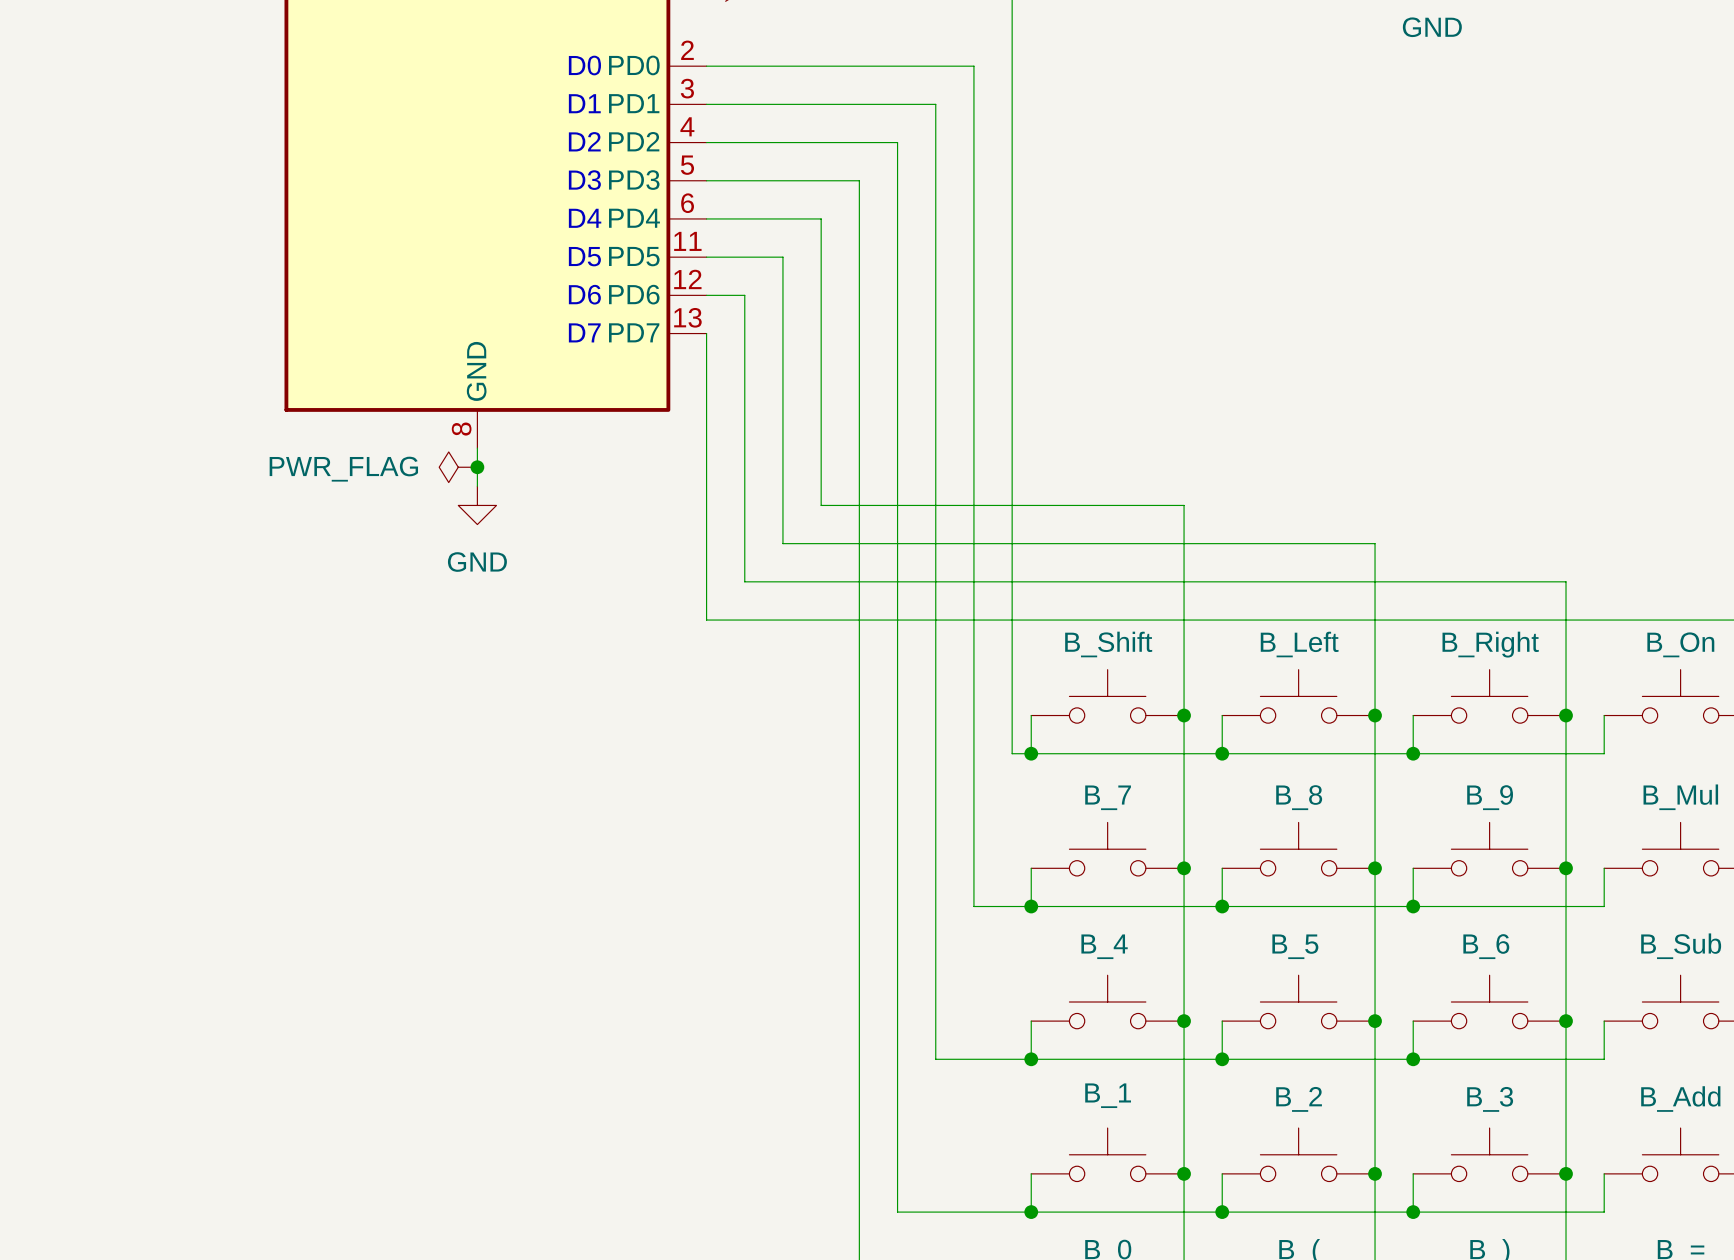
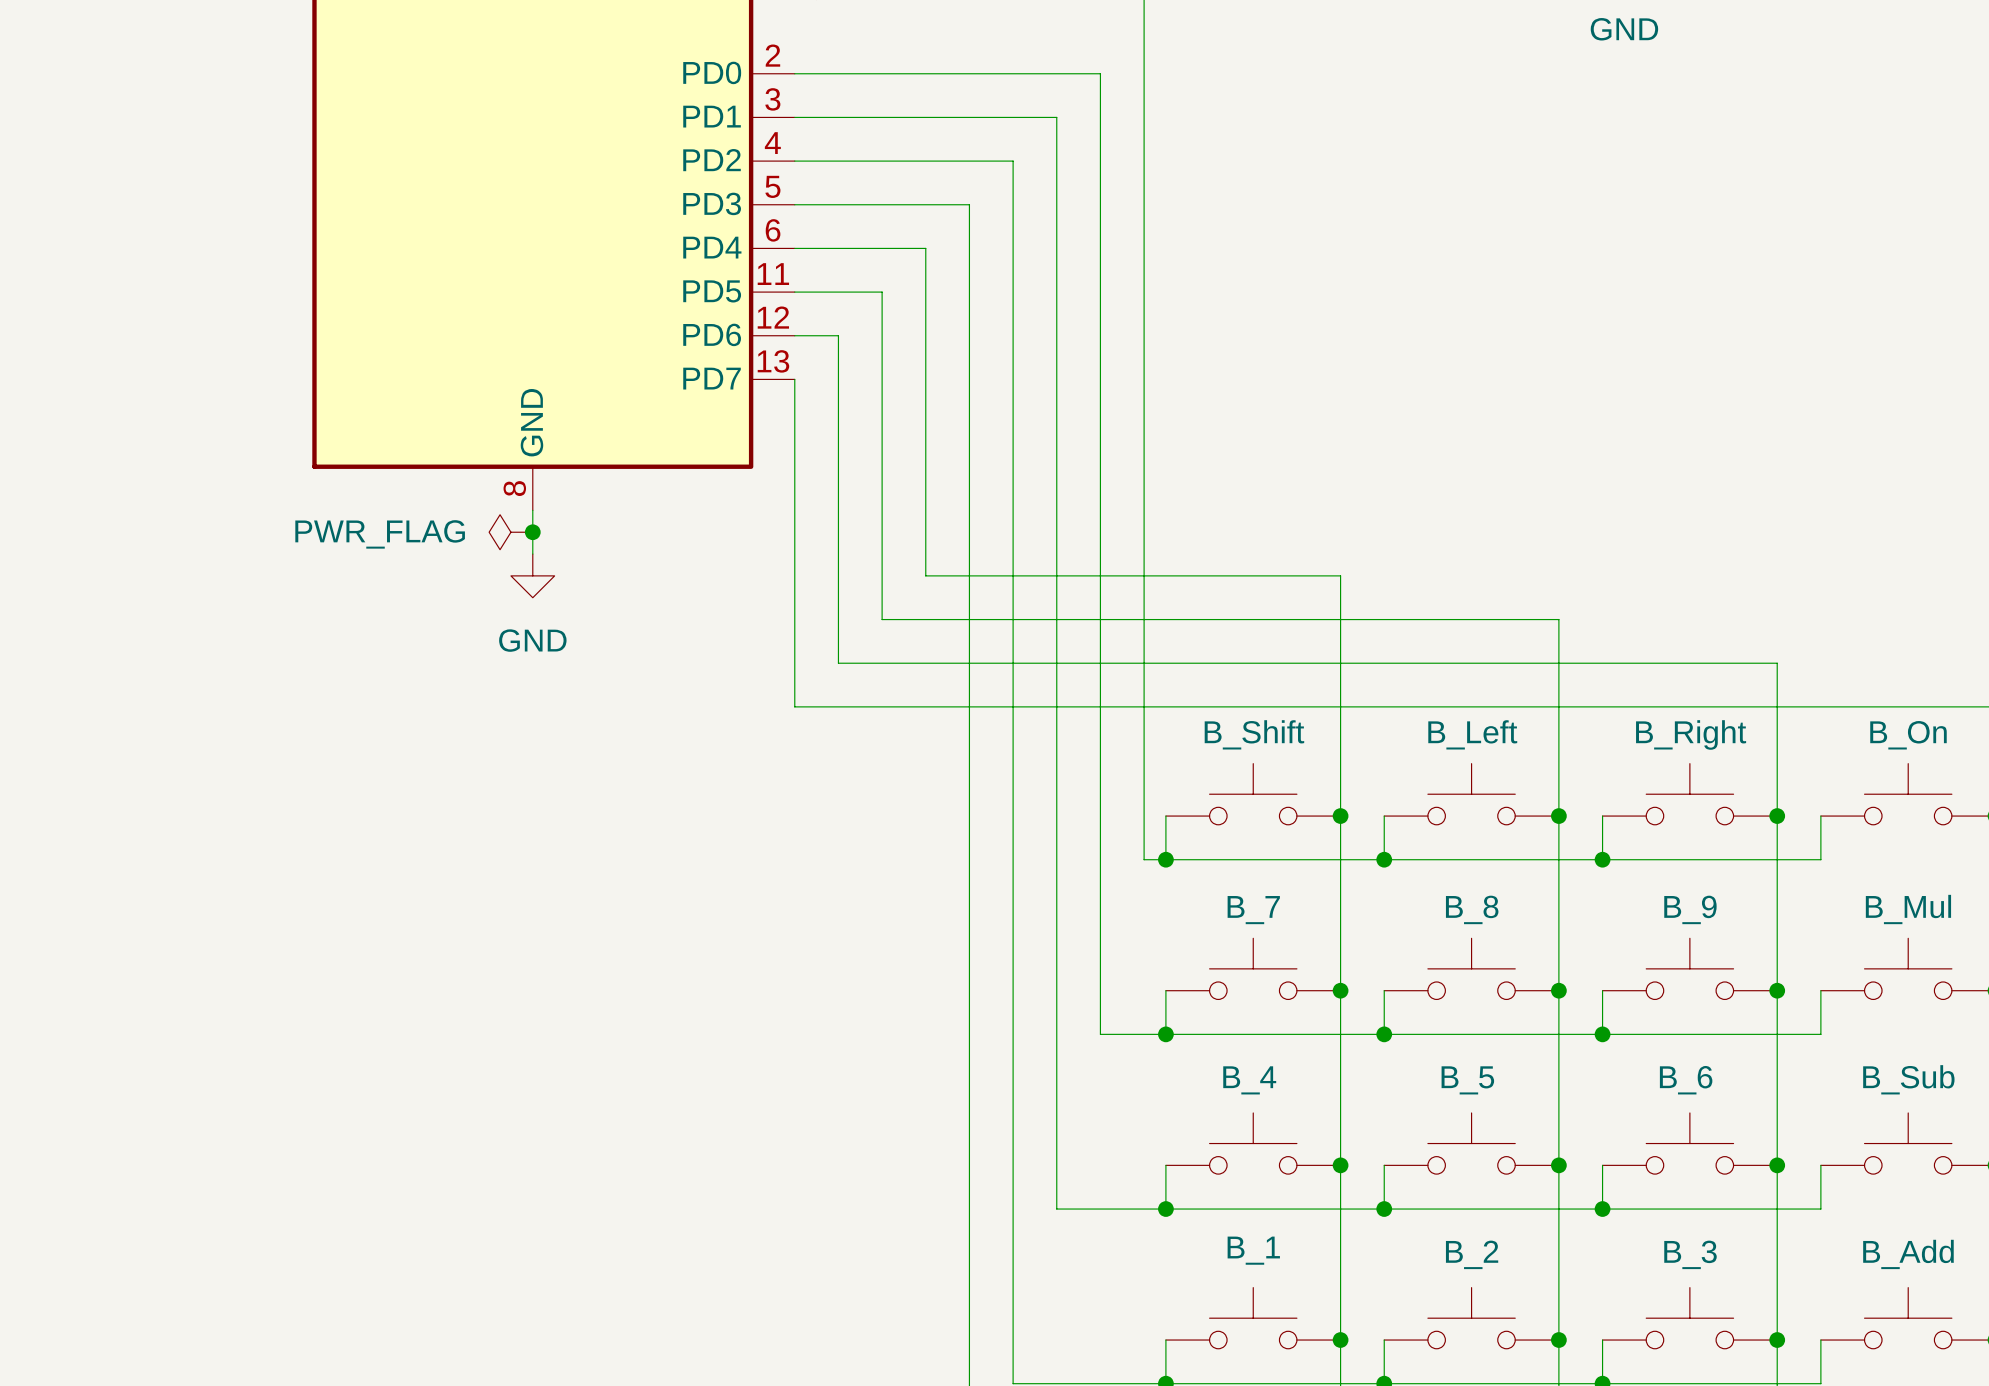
text: D0 (584, 65) -> none
text: D1 (584, 103) -> none
text: D2 (584, 141) -> none
text: D3 (584, 180) -> none
text: D4 (585, 218) -> none
text: D5 (584, 256) -> none
text: D6 (584, 294) -> none
text: D7 (584, 332) -> none

